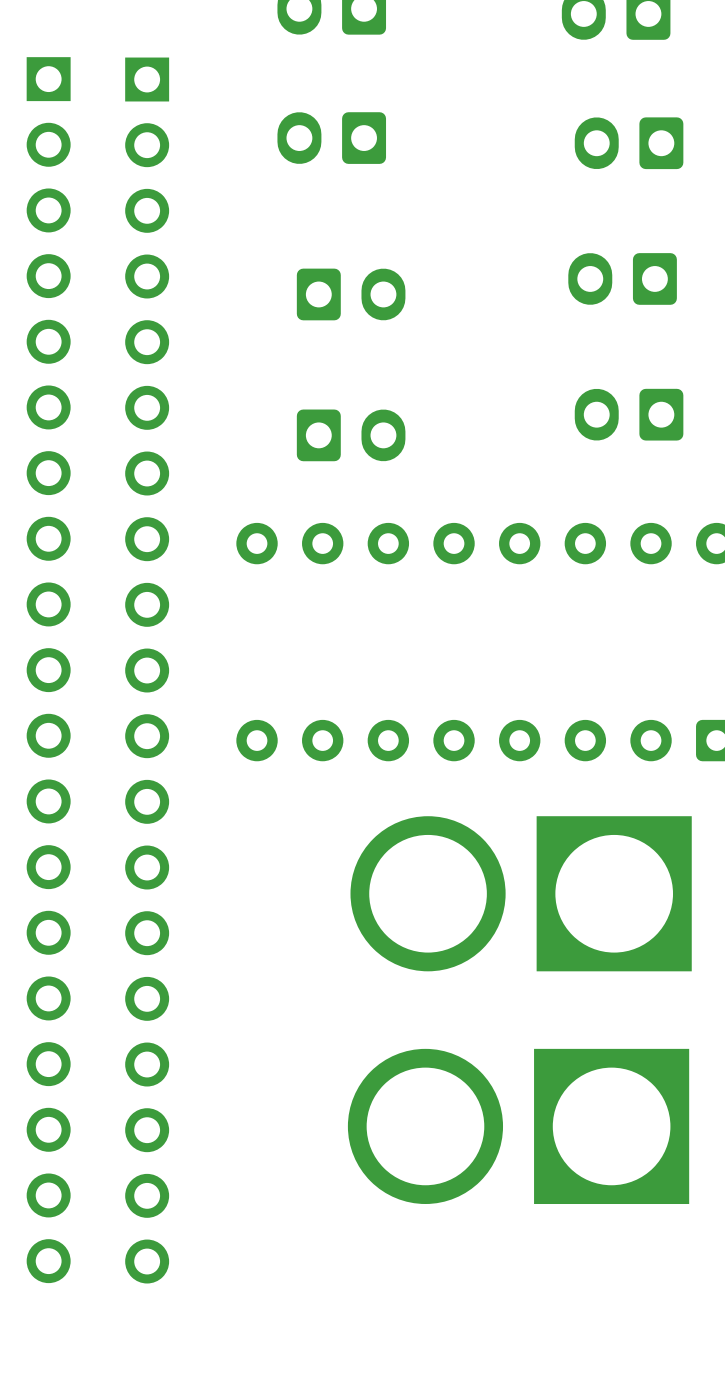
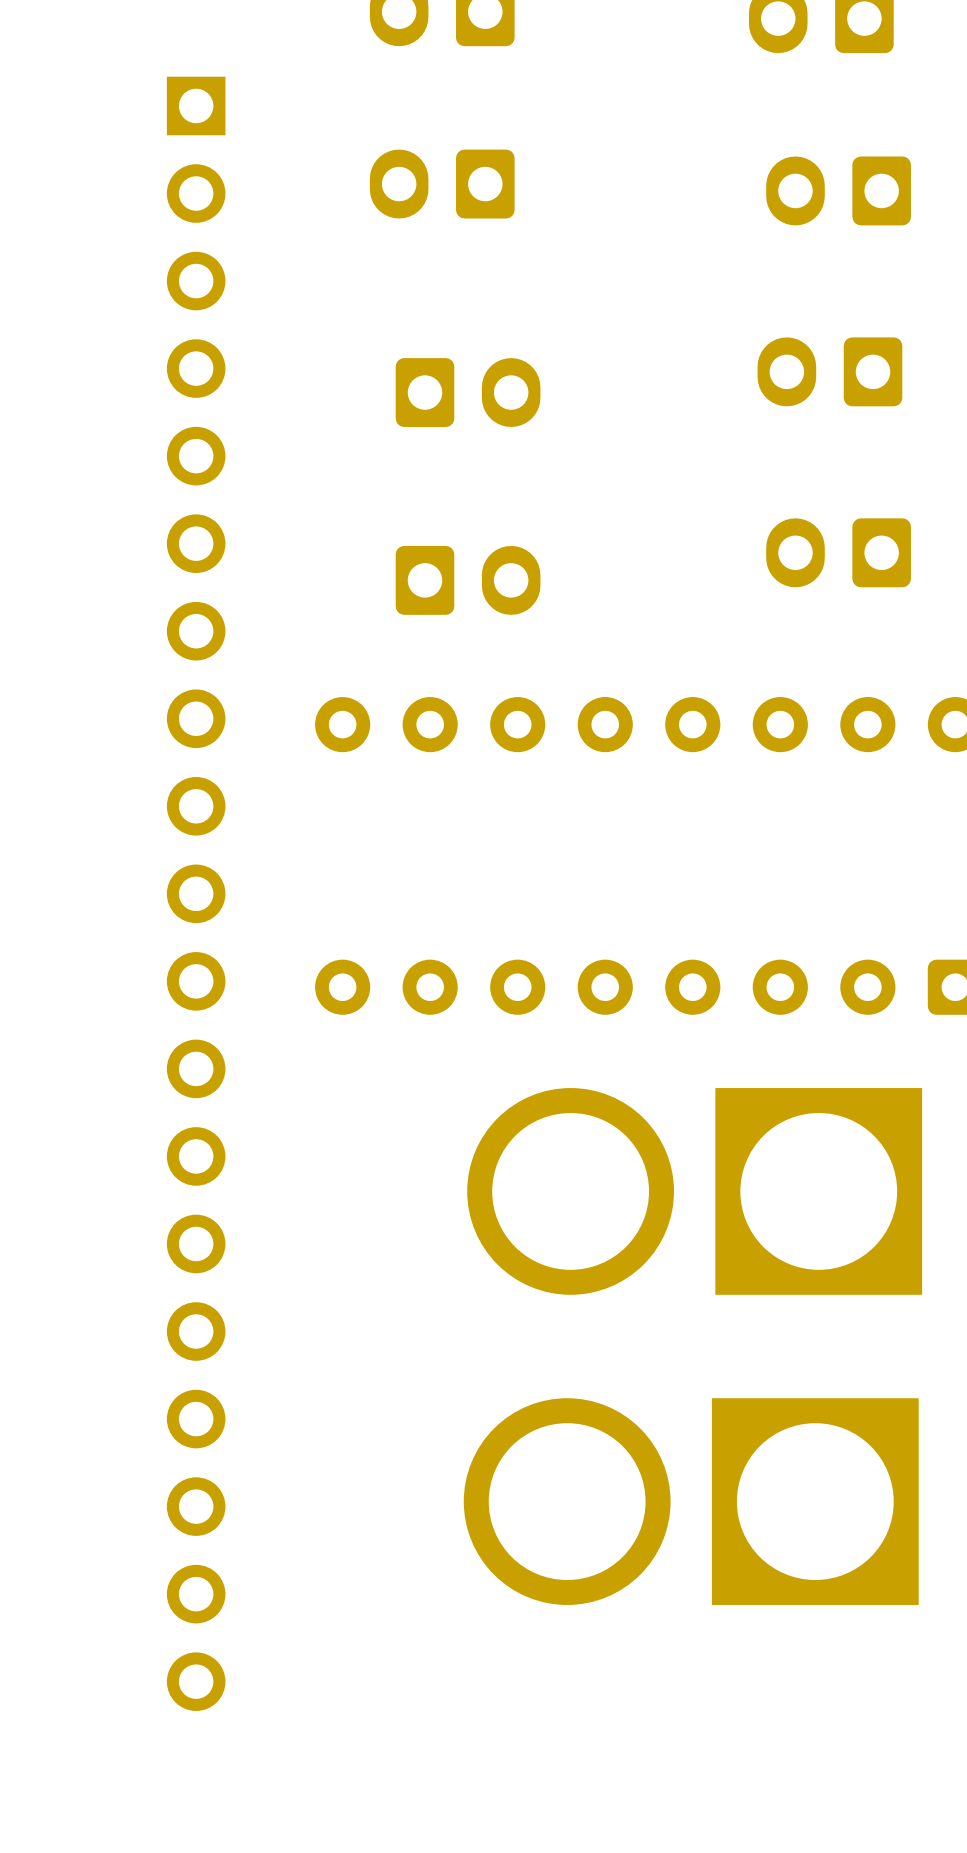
part: (48, 670) -> none

